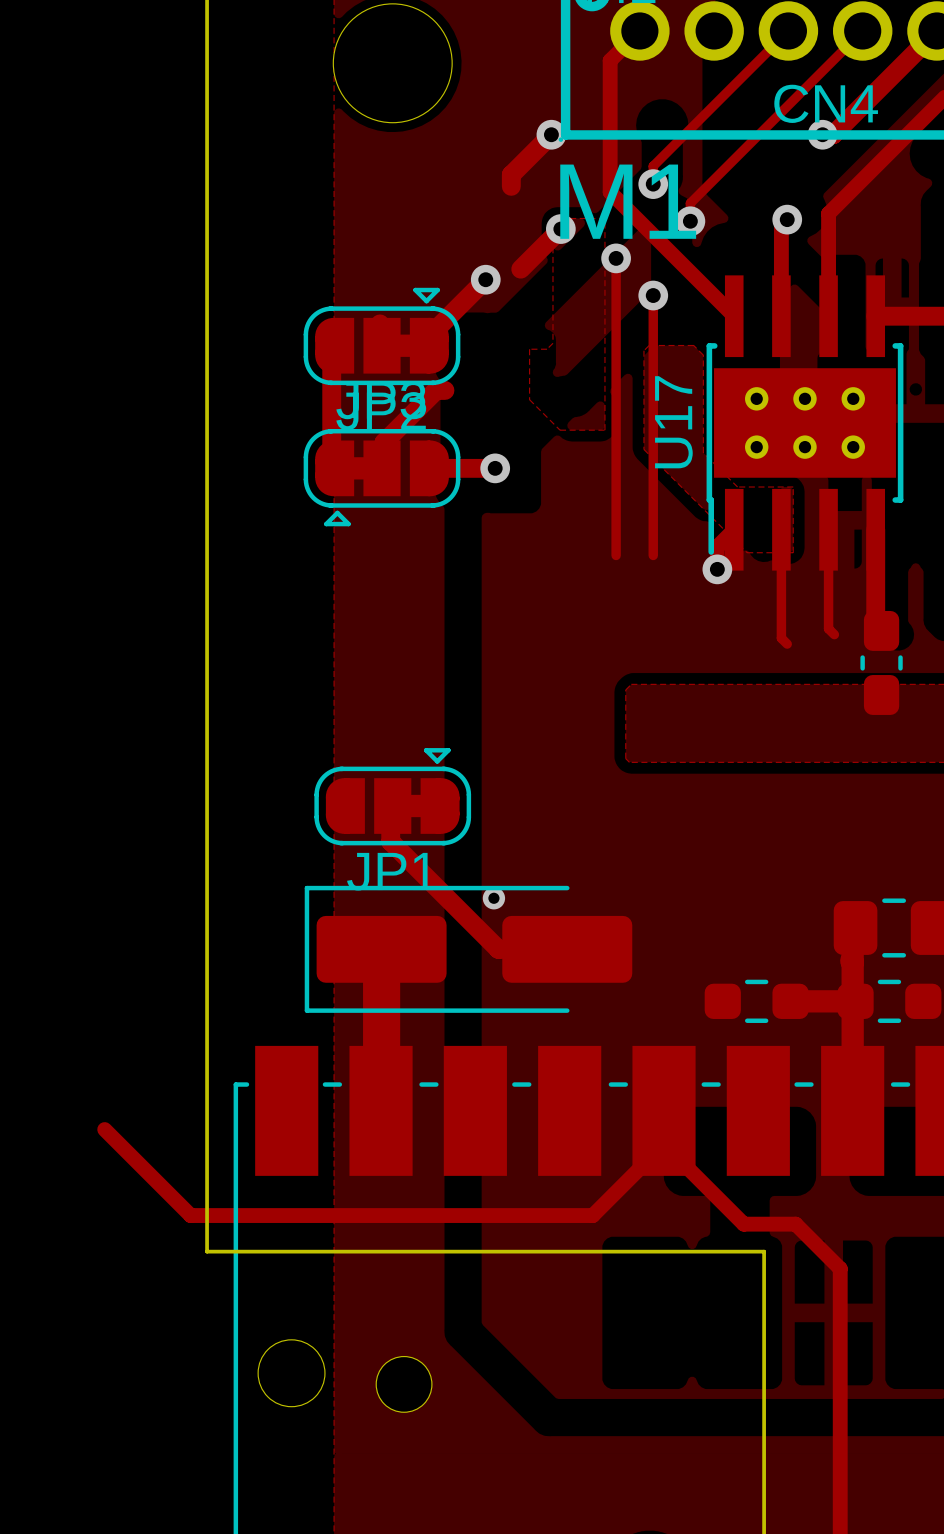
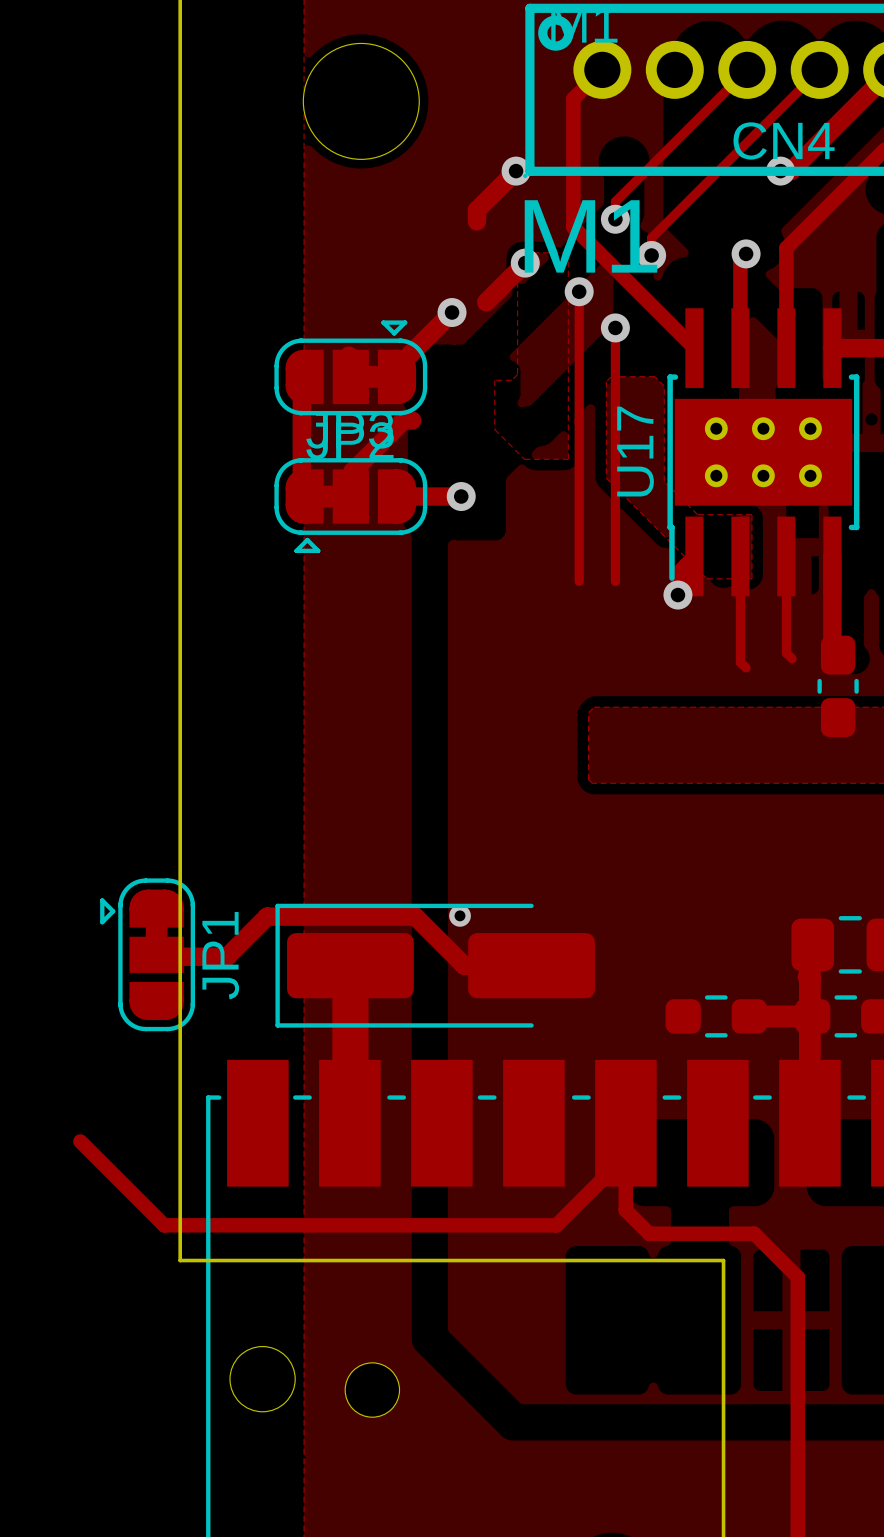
JP1 rotation: 0° (392, 796) -> 90° counterclockwise (147, 954)
JP1 position: (392, 796) -> (147, 954)
track: (390, 824) (390, 841) (448, 899) -> (156, 956) (227, 956) (267, 916) (415, 916)
track: (664, 1144) (743, 1224) -> (625, 1156) (625, 1210) (649, 1233) (703, 1233)

